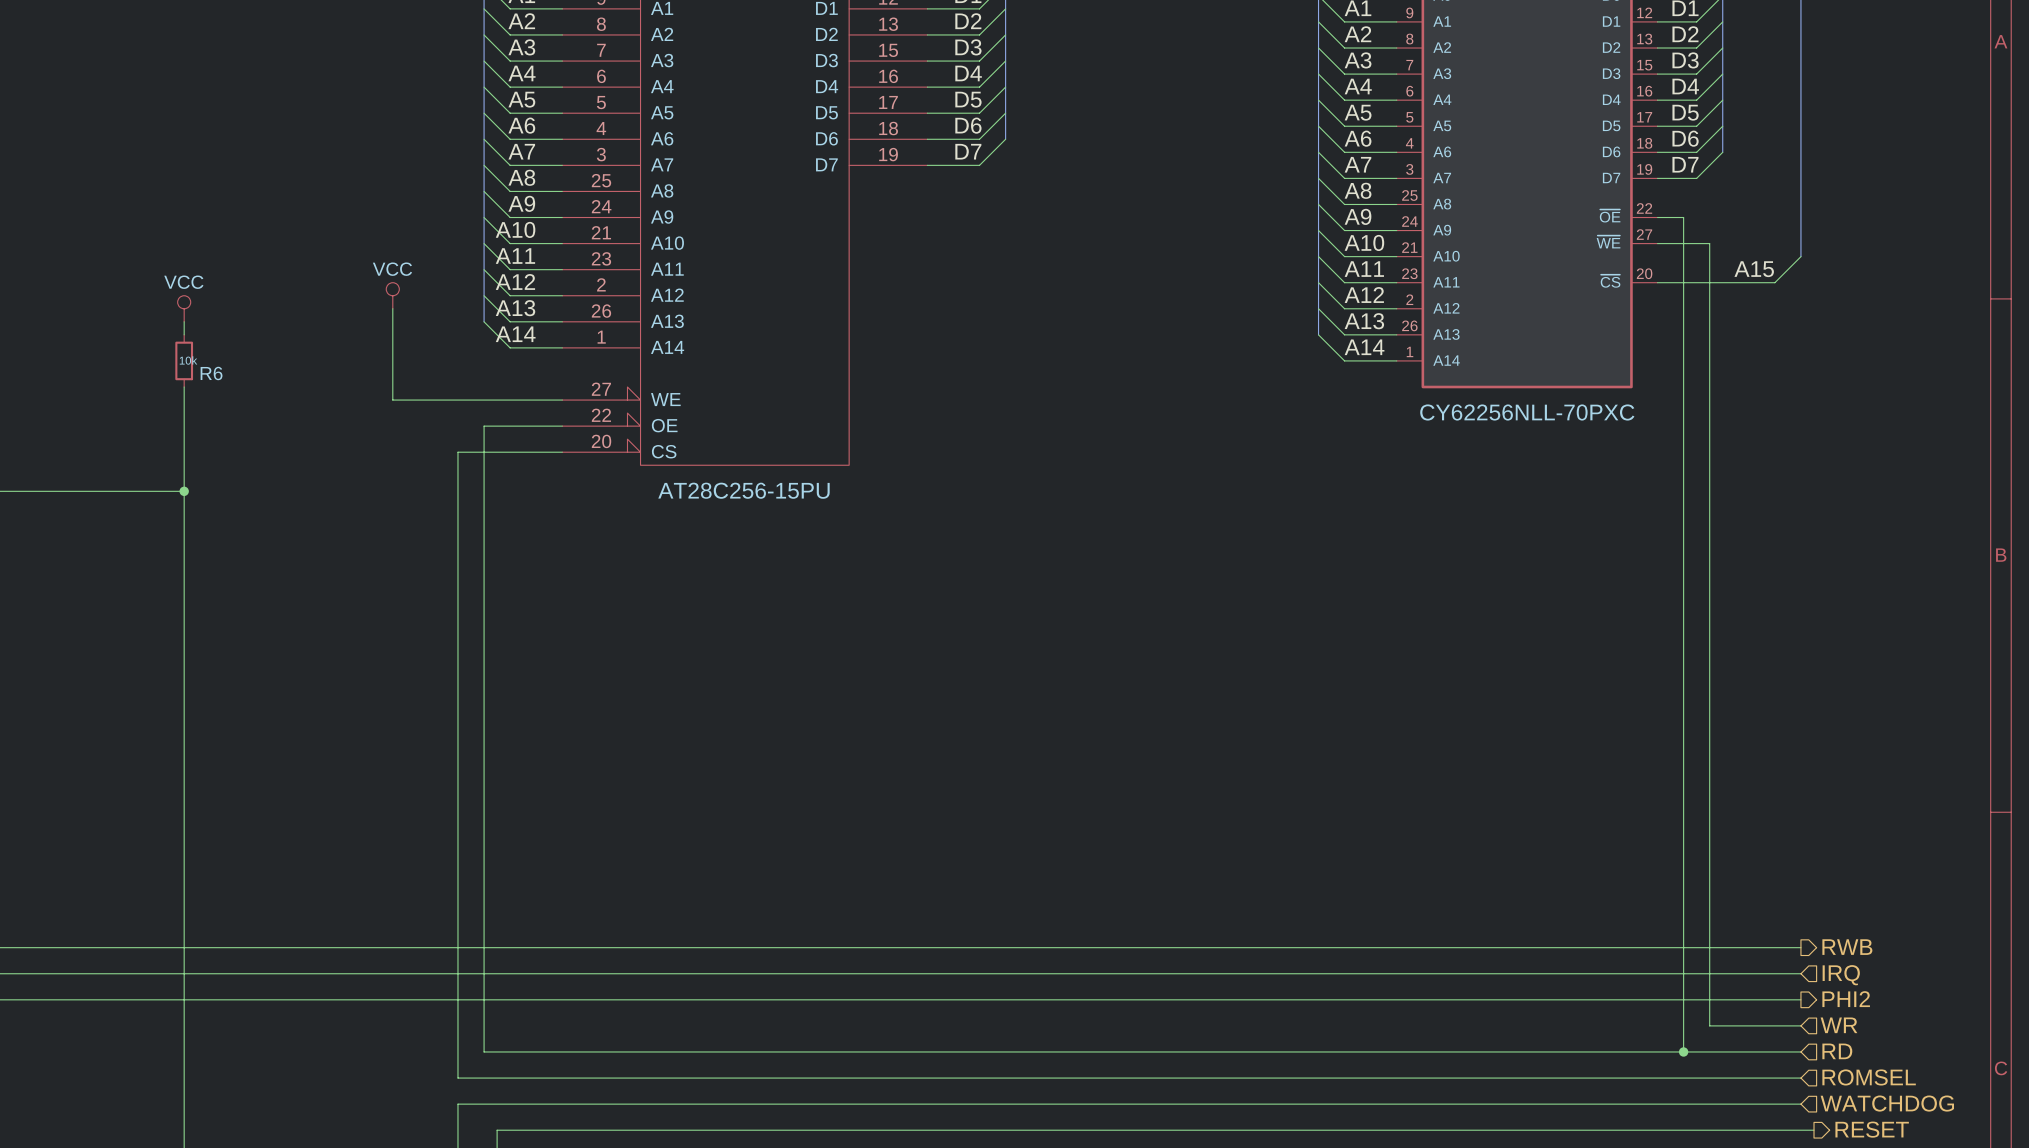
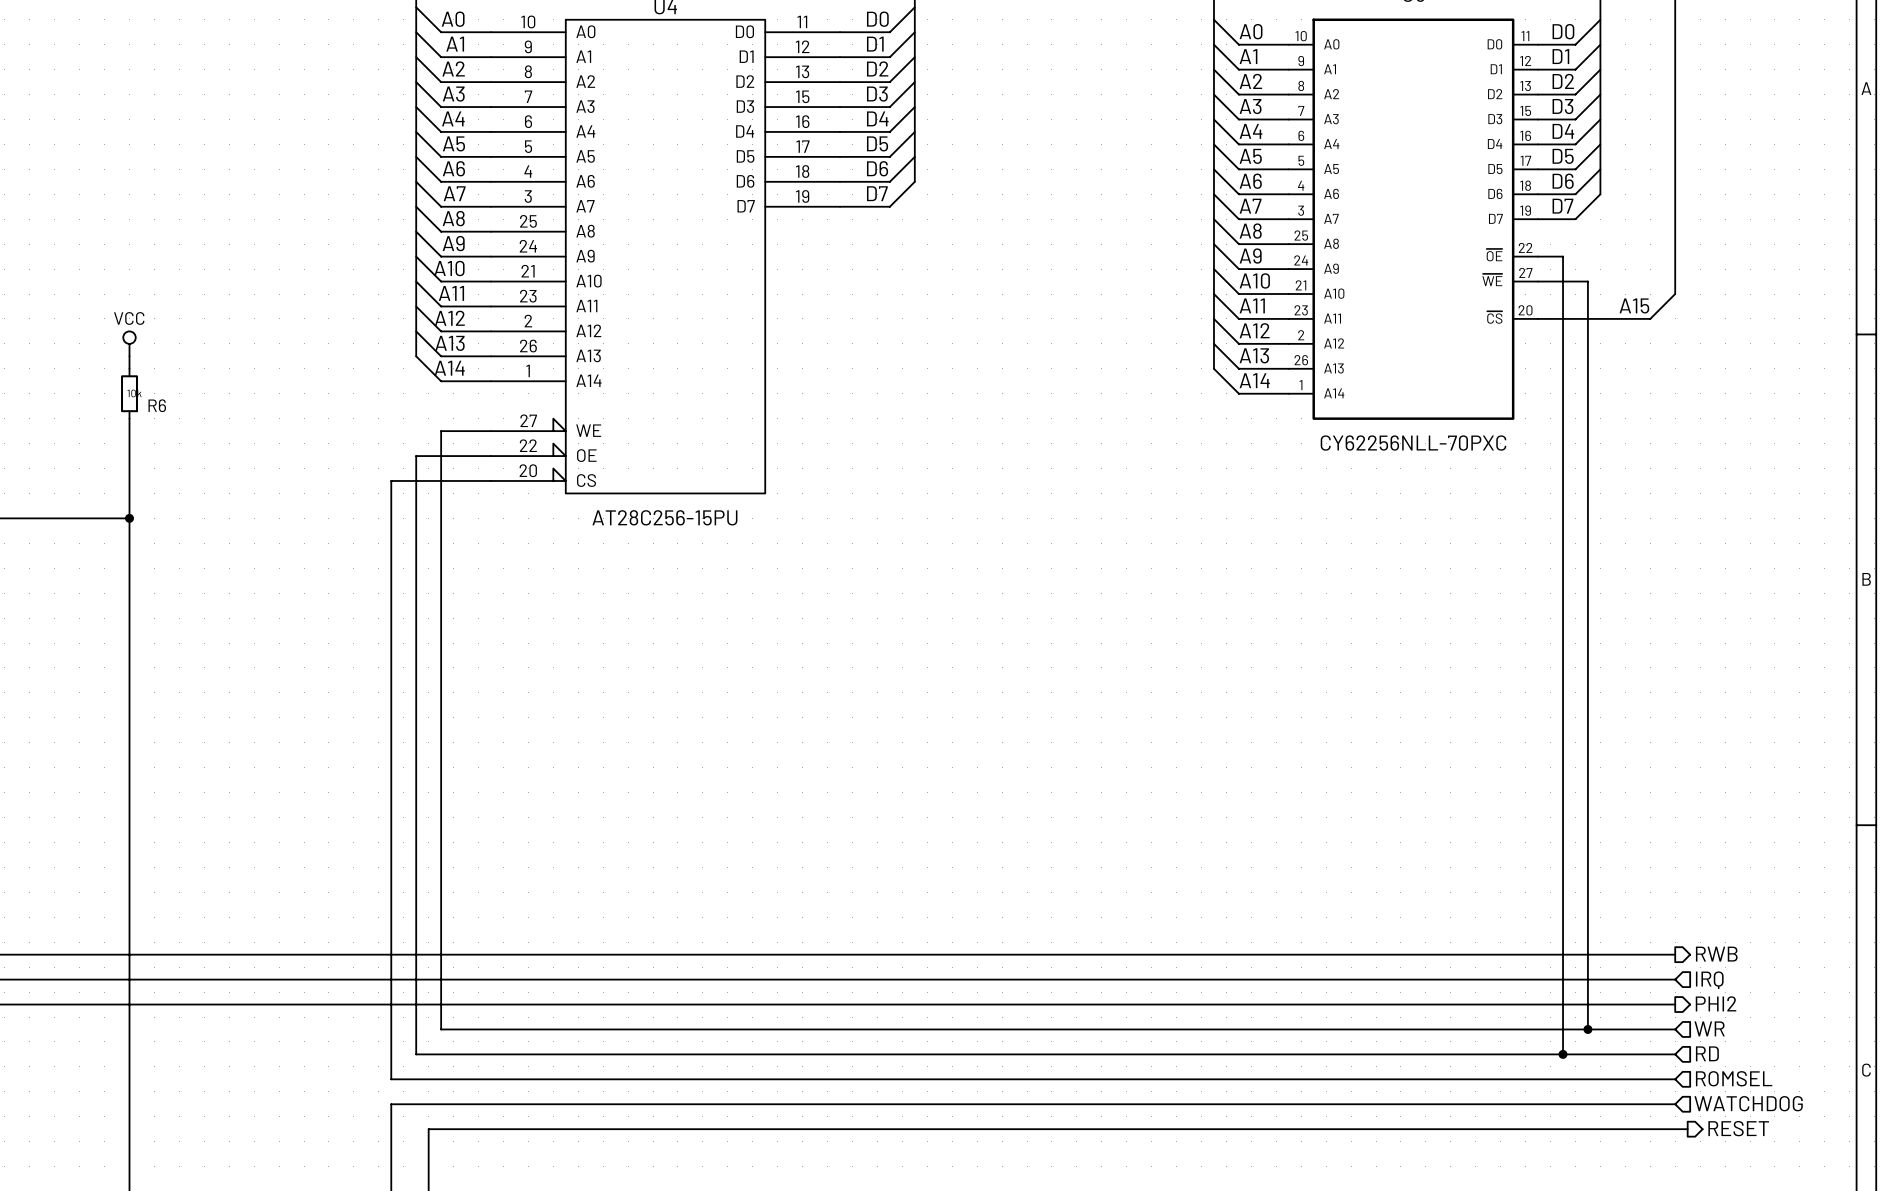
power symbol: VCC (392, 295) -> none
wire: (392, 308) (392, 400) (510, 400) -> (1587, 1029) (441, 1029) (441, 431)
junction: none -> (1587, 1029)

